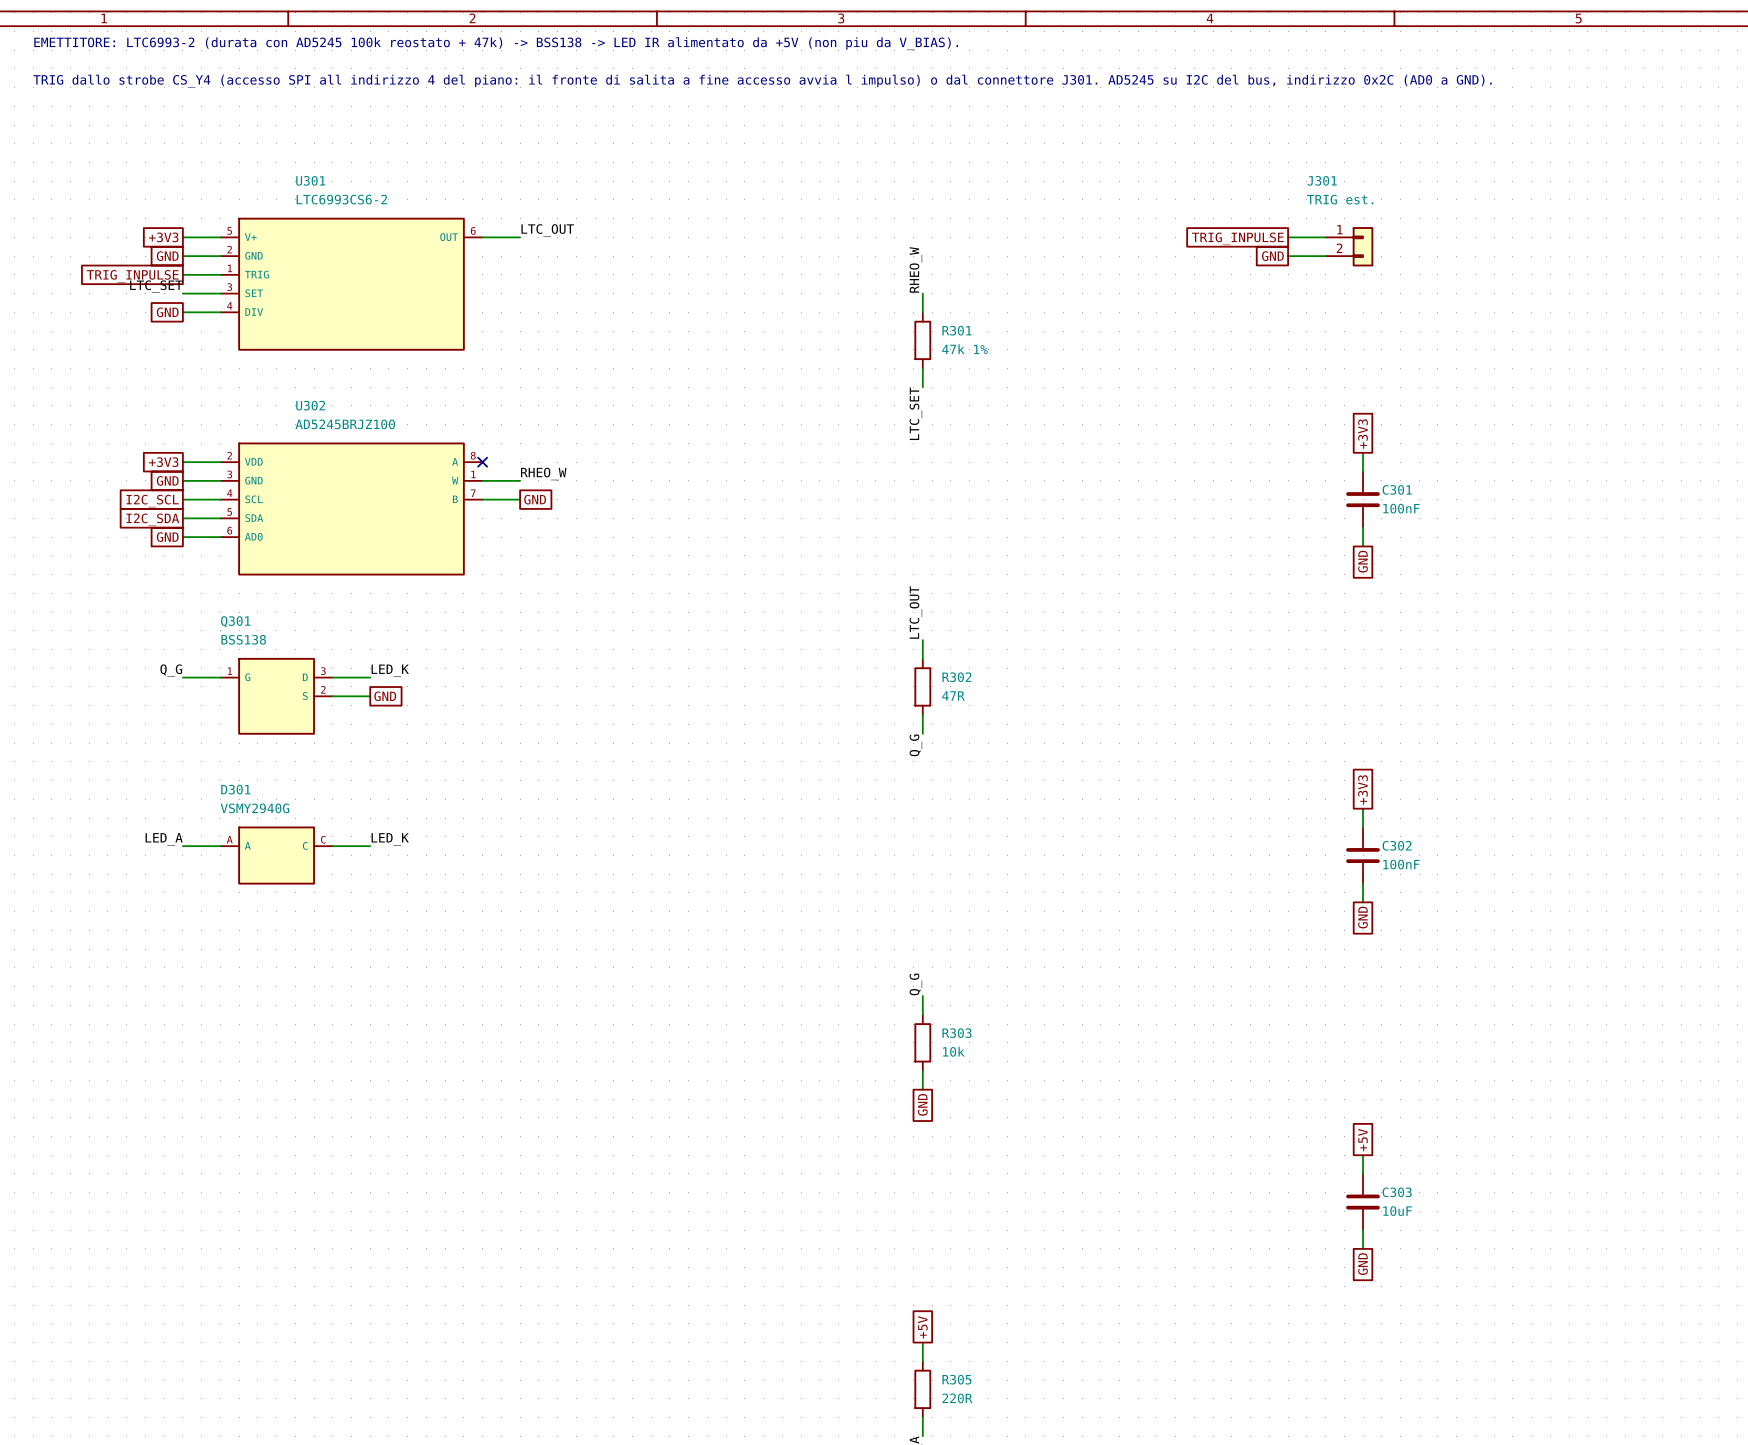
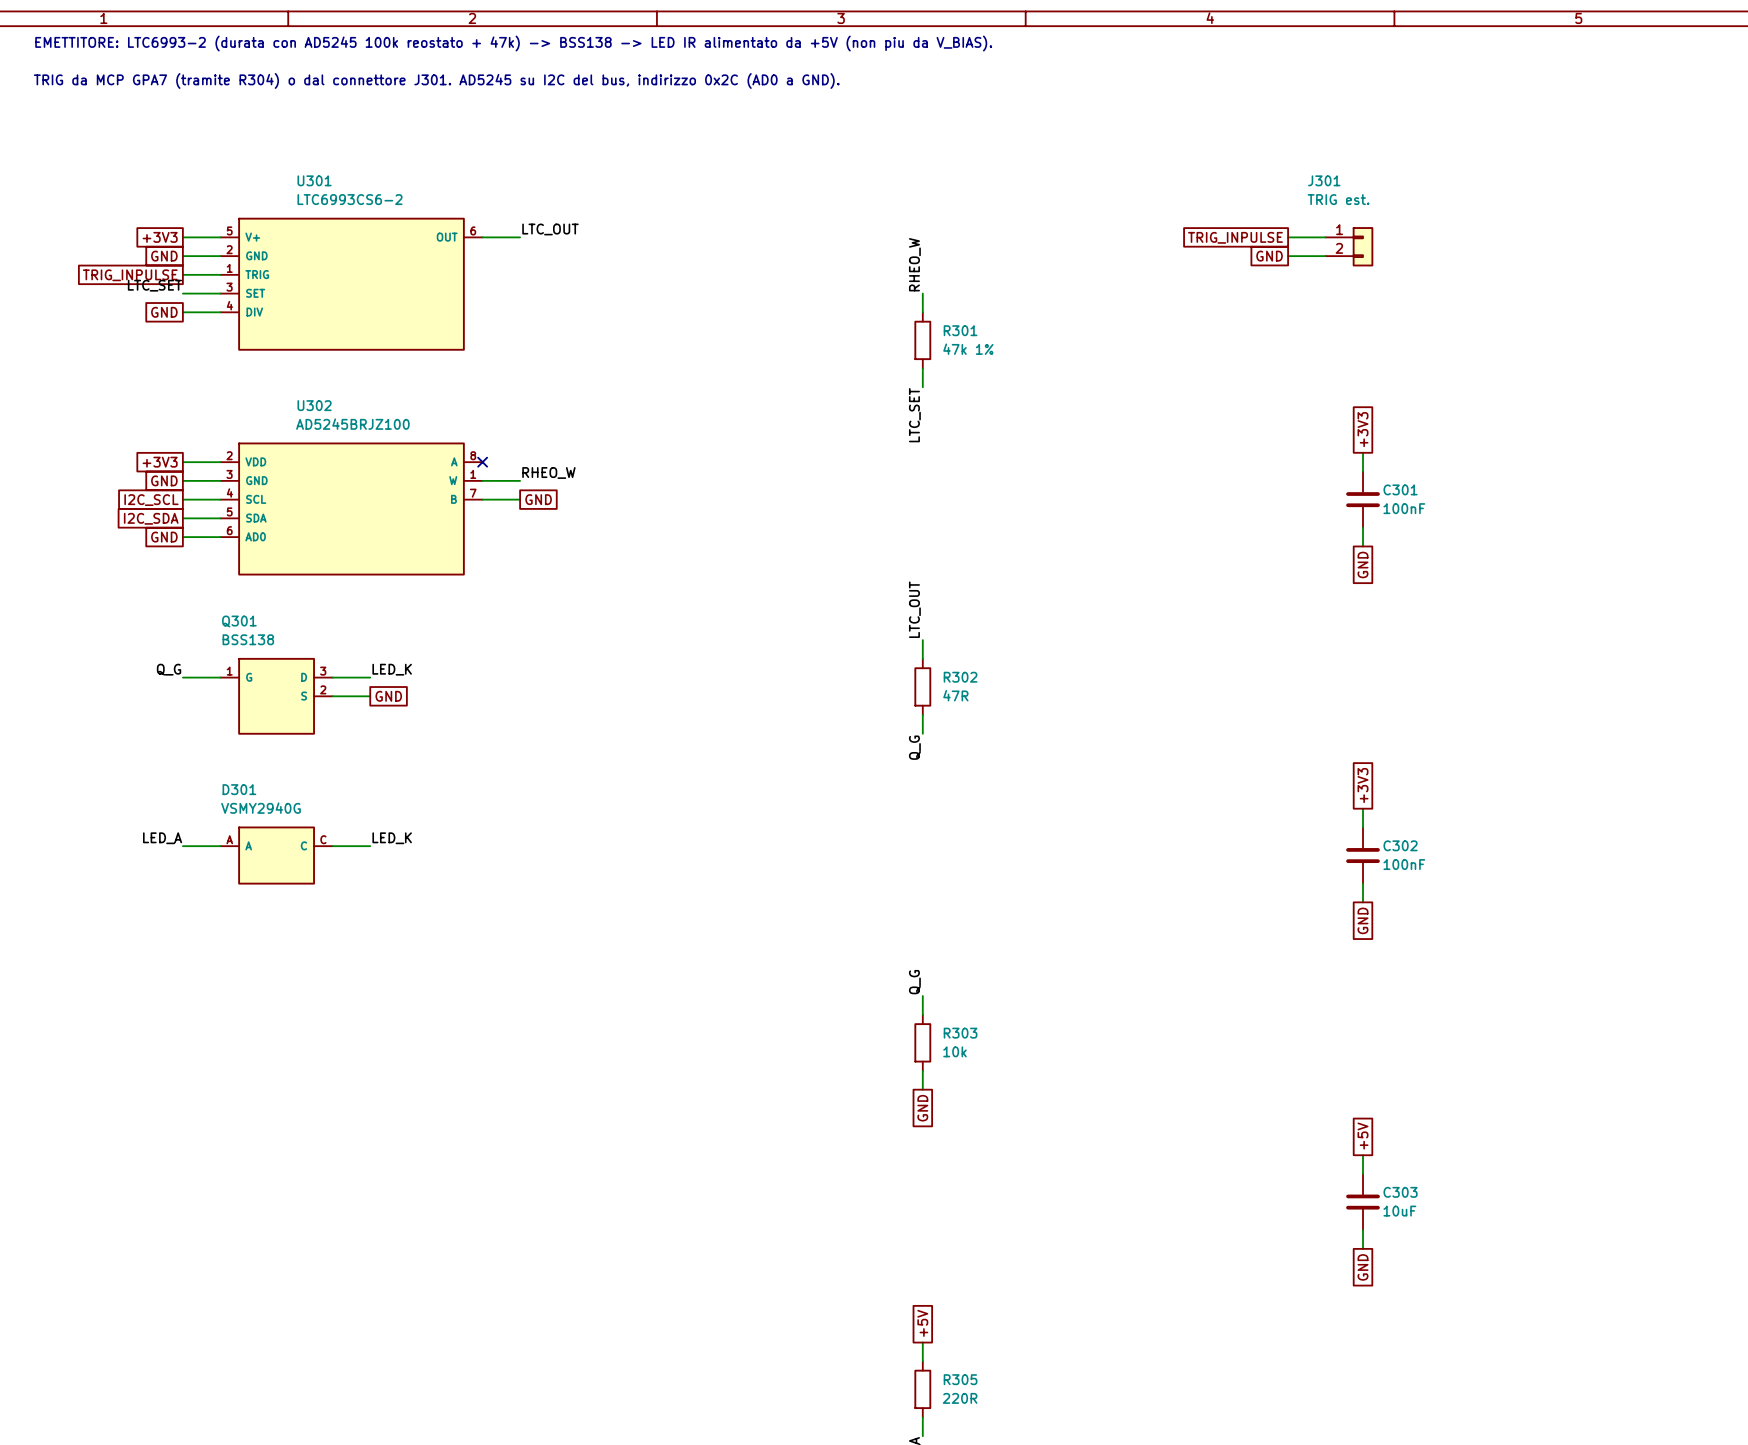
text: TRIG dallo strobe CS_Y4 (accesso SPI all indirizzo 4 del piano: il fronte di salita a fine accesso avvia l impulso) o dal connettore J301. AD5245 su I2C del bus, indirizzo 0x2C (AD0 a GND). (762, 81) -> TRIG da MCP GPA7 (tramite R304) o dal connettore J301. AD5245 su I2C del bus, indirizzo 0x2C (AD0 a GND). (436, 80)

